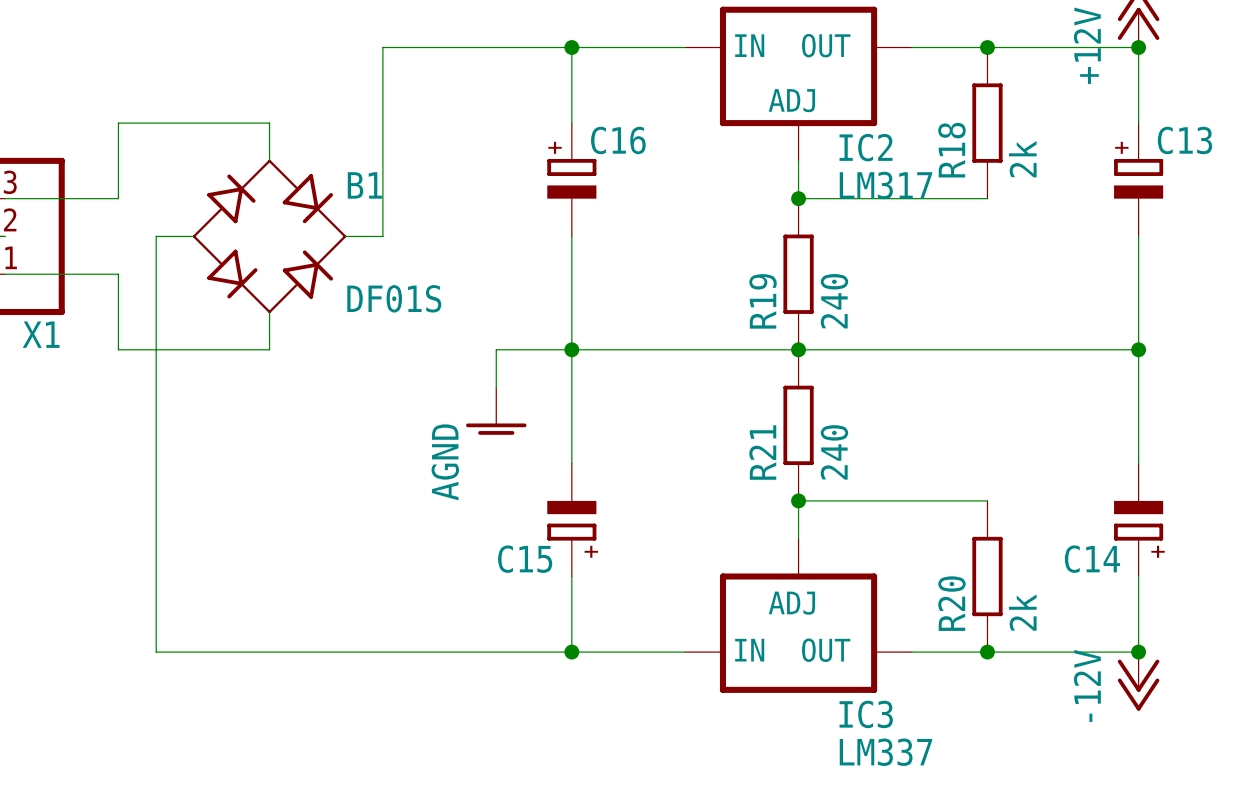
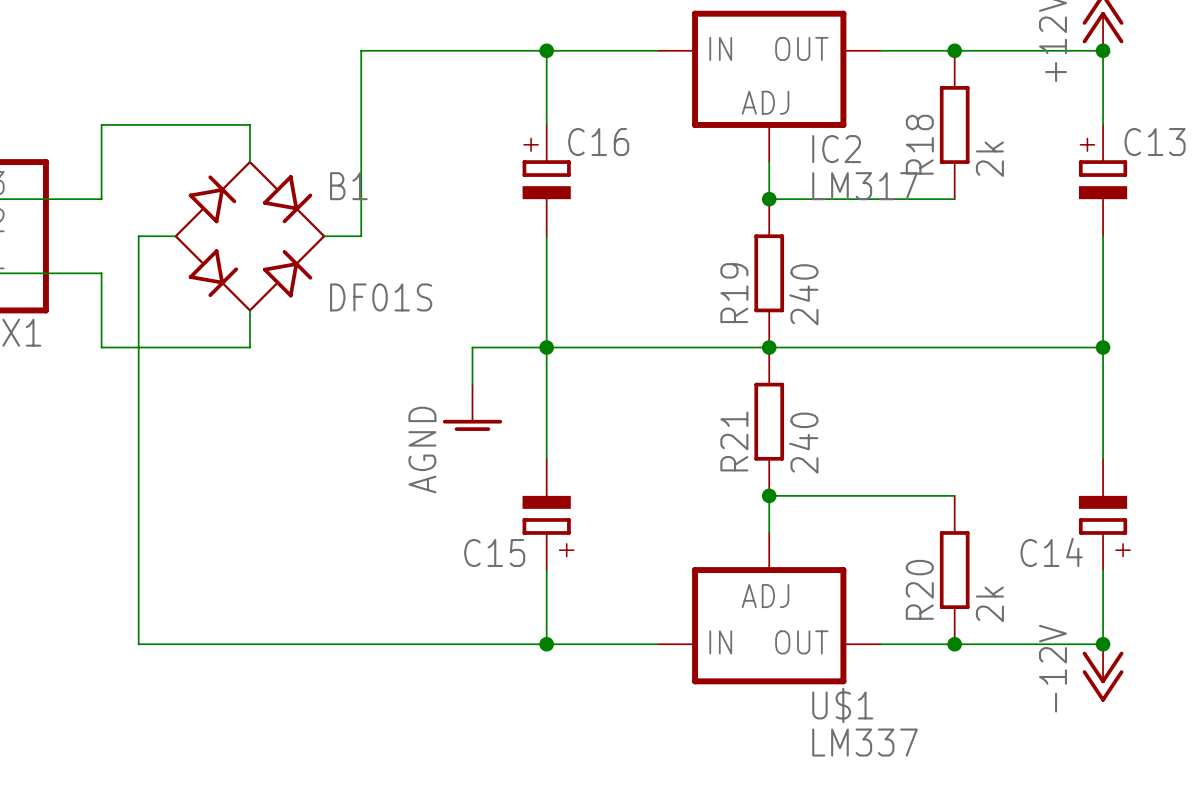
IC3 name: IC3 (866, 714) -> U$1 (842, 705)

